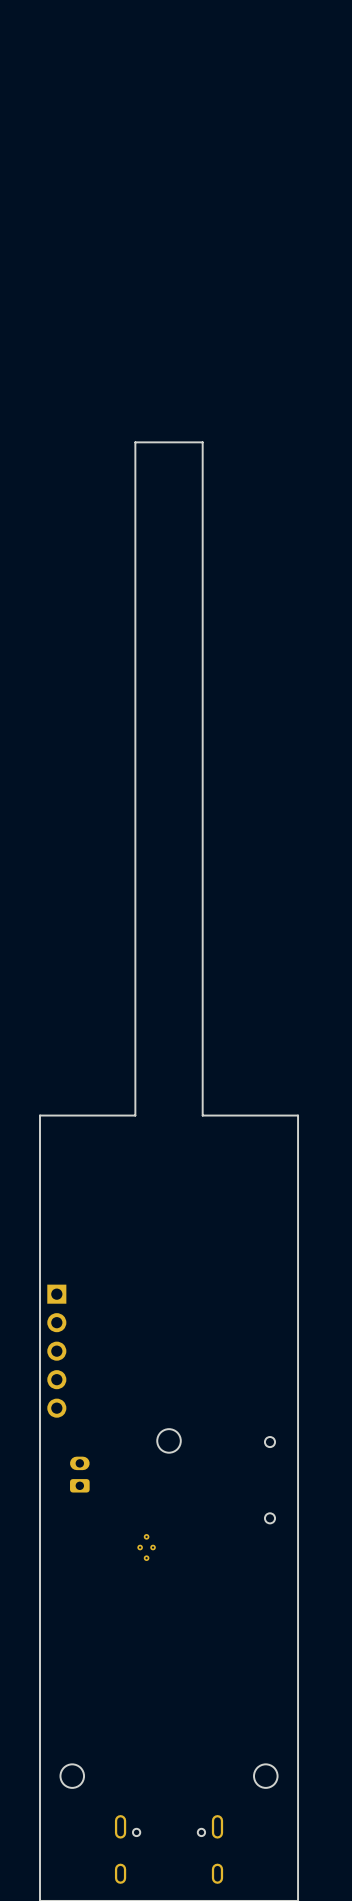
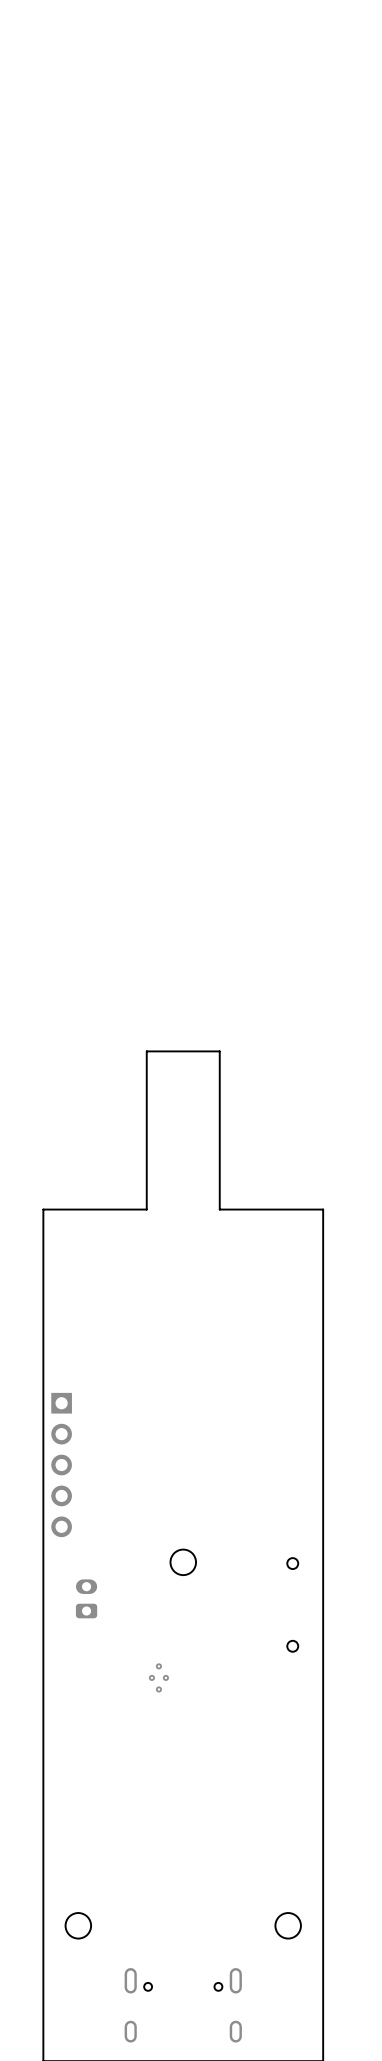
board edge: (202, 969) (202, 442) (135, 442) (135, 969) -> (219, 1051) (146, 1051)

